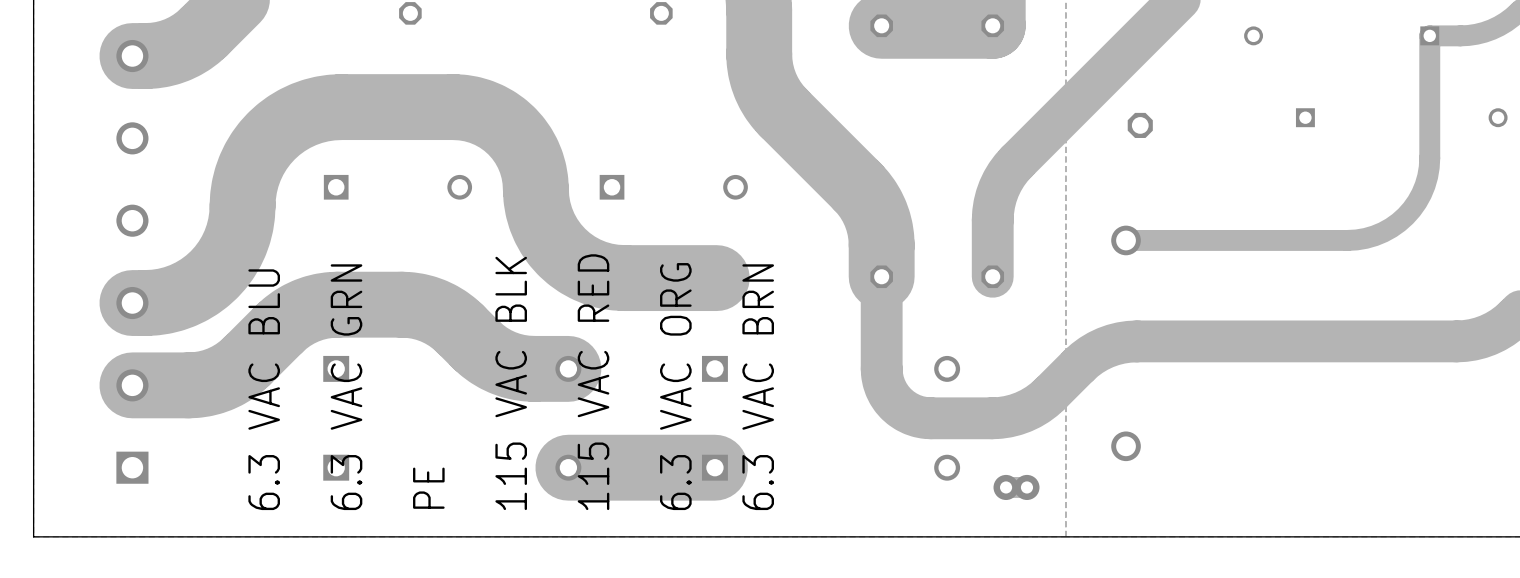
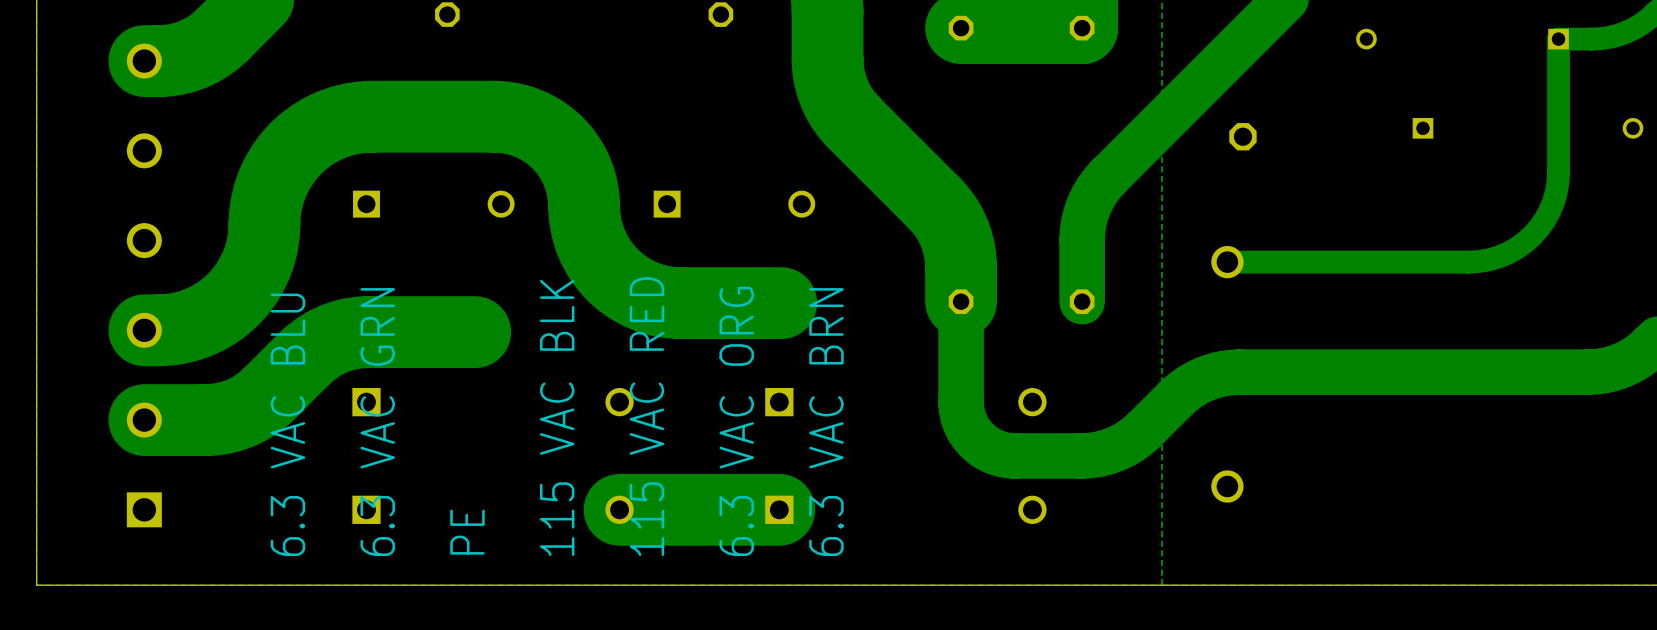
track: (401, 304) (417, 306) (440, 314) (454, 323) (482, 350) (502, 362) (526, 368) (568, 368) -> (438, 332) (475, 332)
part: (1016, 487) -> none

